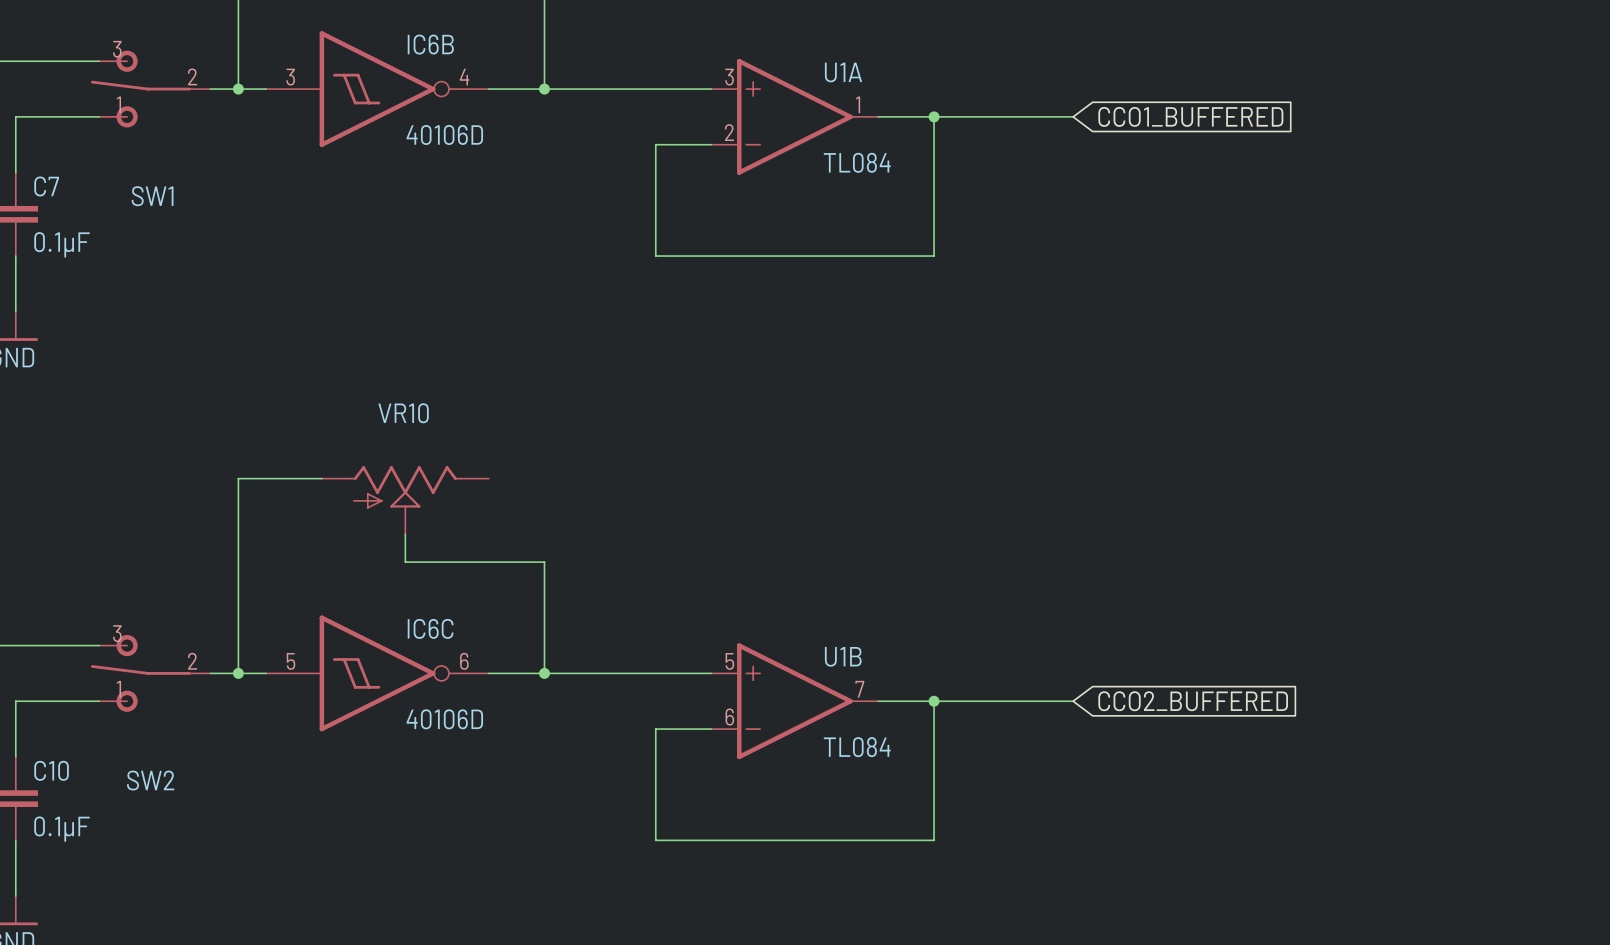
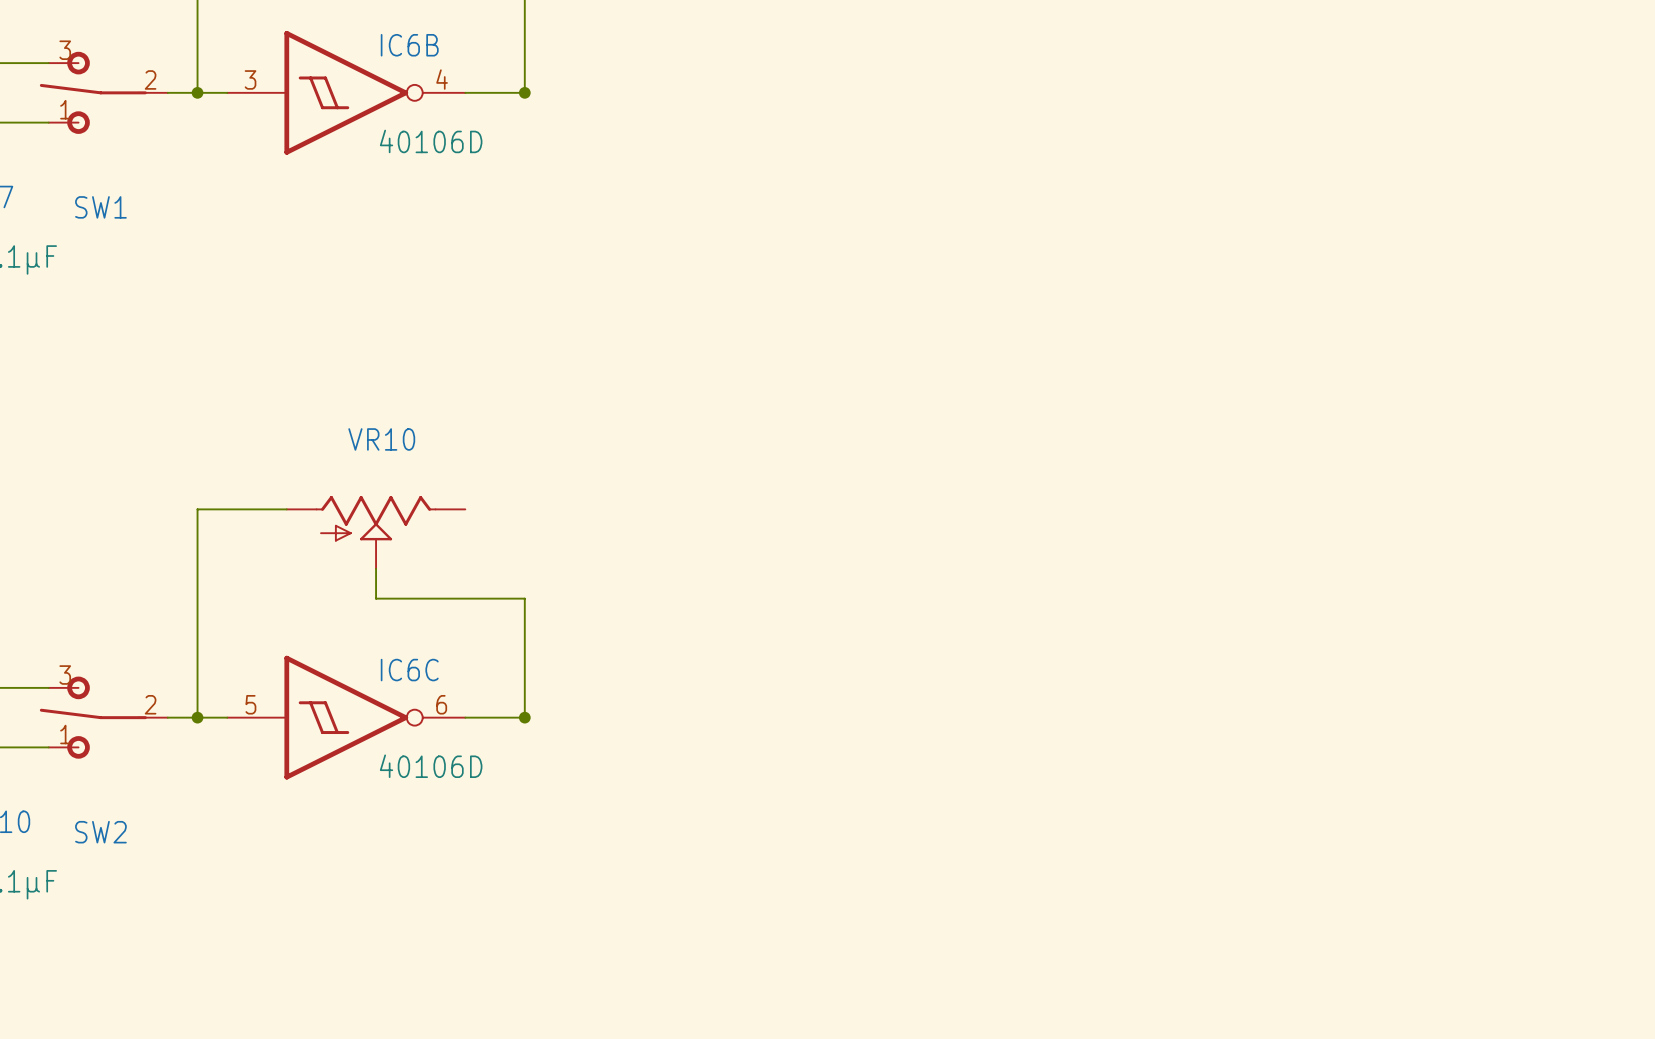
wire: (544, 89) (711, 89) -> none
U1A: TL084 (794, 116) -> none
wire: (878, 116) (1073, 116) -> none
wire: (934, 116) (934, 256) (655, 256) (655, 144) (711, 144) -> none
junction: (934, 116) -> none
global label: CCO1_BUFFERED (1190, 116) -> none
wire: (544, 673) (711, 673) -> none
U1B: TL084 (794, 701) -> none
wire: (878, 701) (1073, 701) -> none
wire: (934, 701) (934, 840) (655, 840) (655, 729) (711, 729) -> none
junction: (934, 701) -> none
global label: CCO2_BUFFERED (1193, 701) -> none

